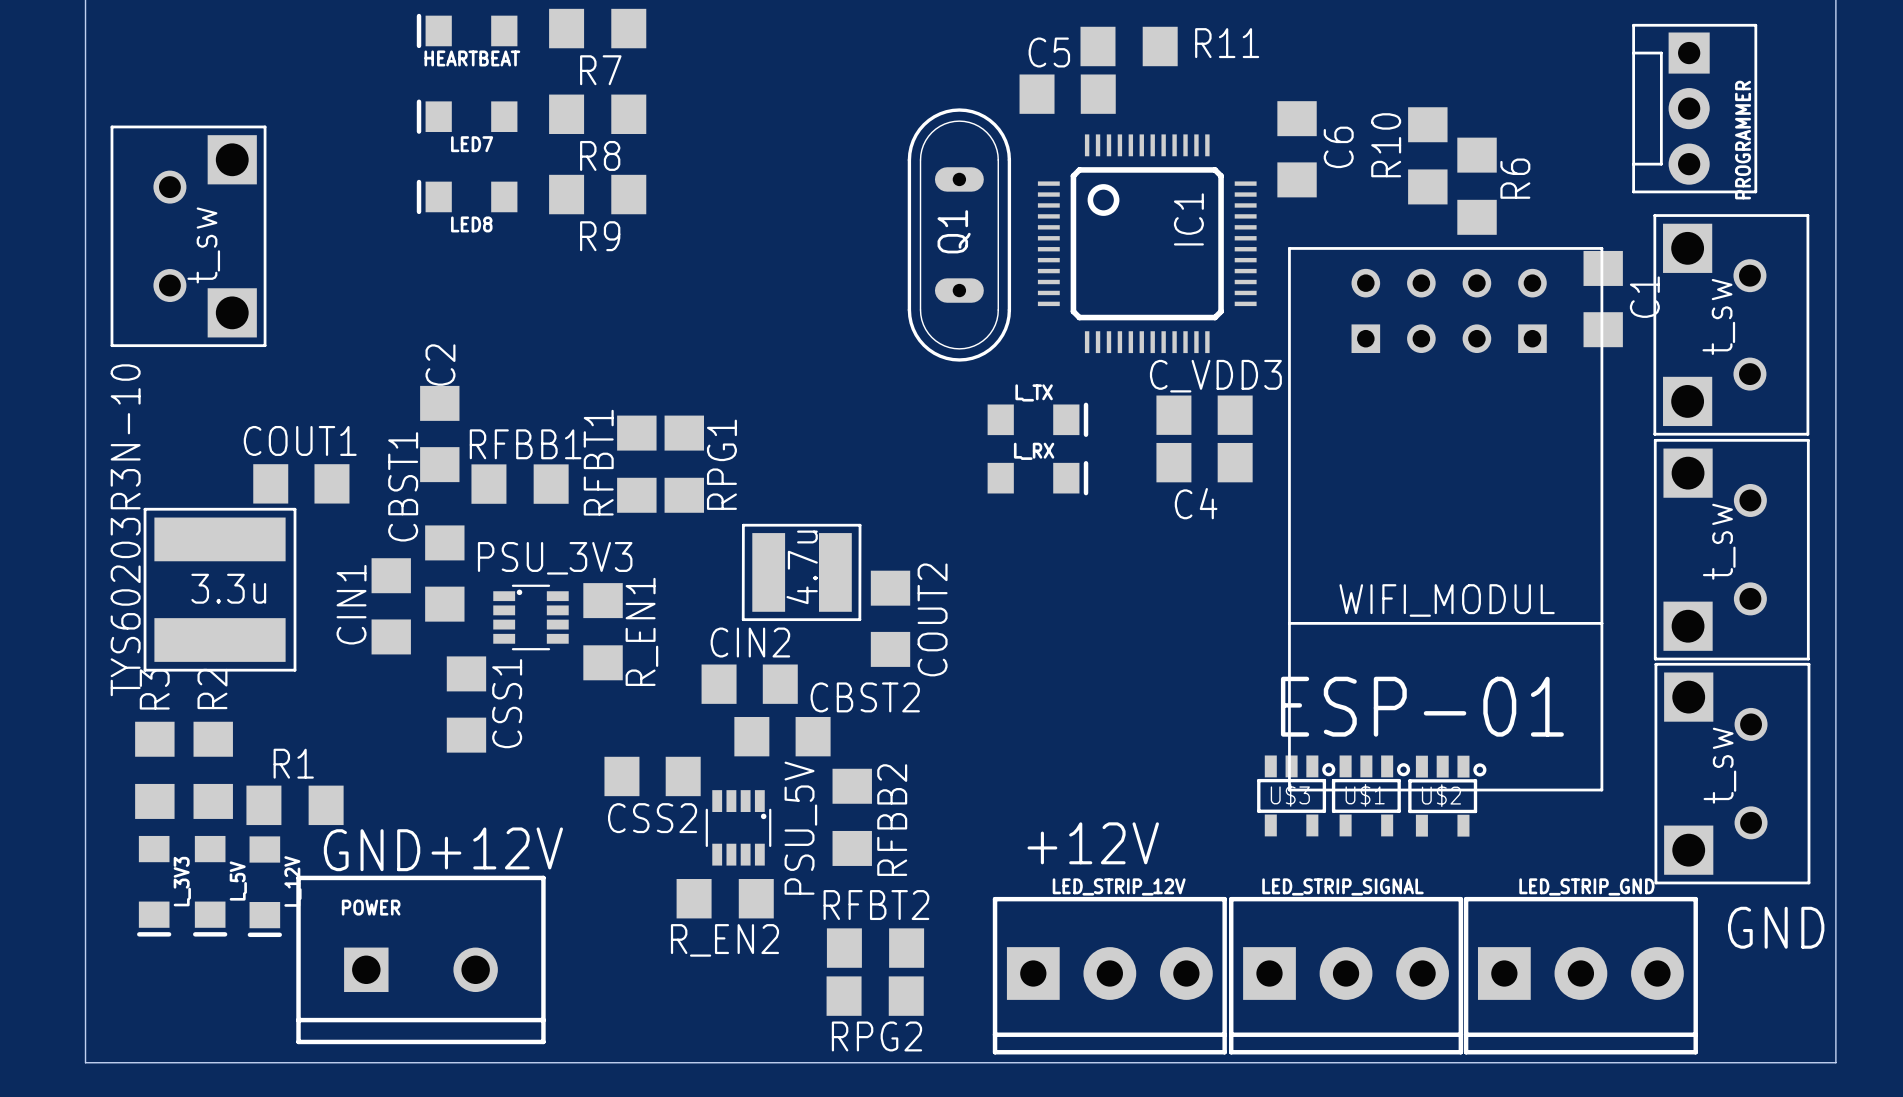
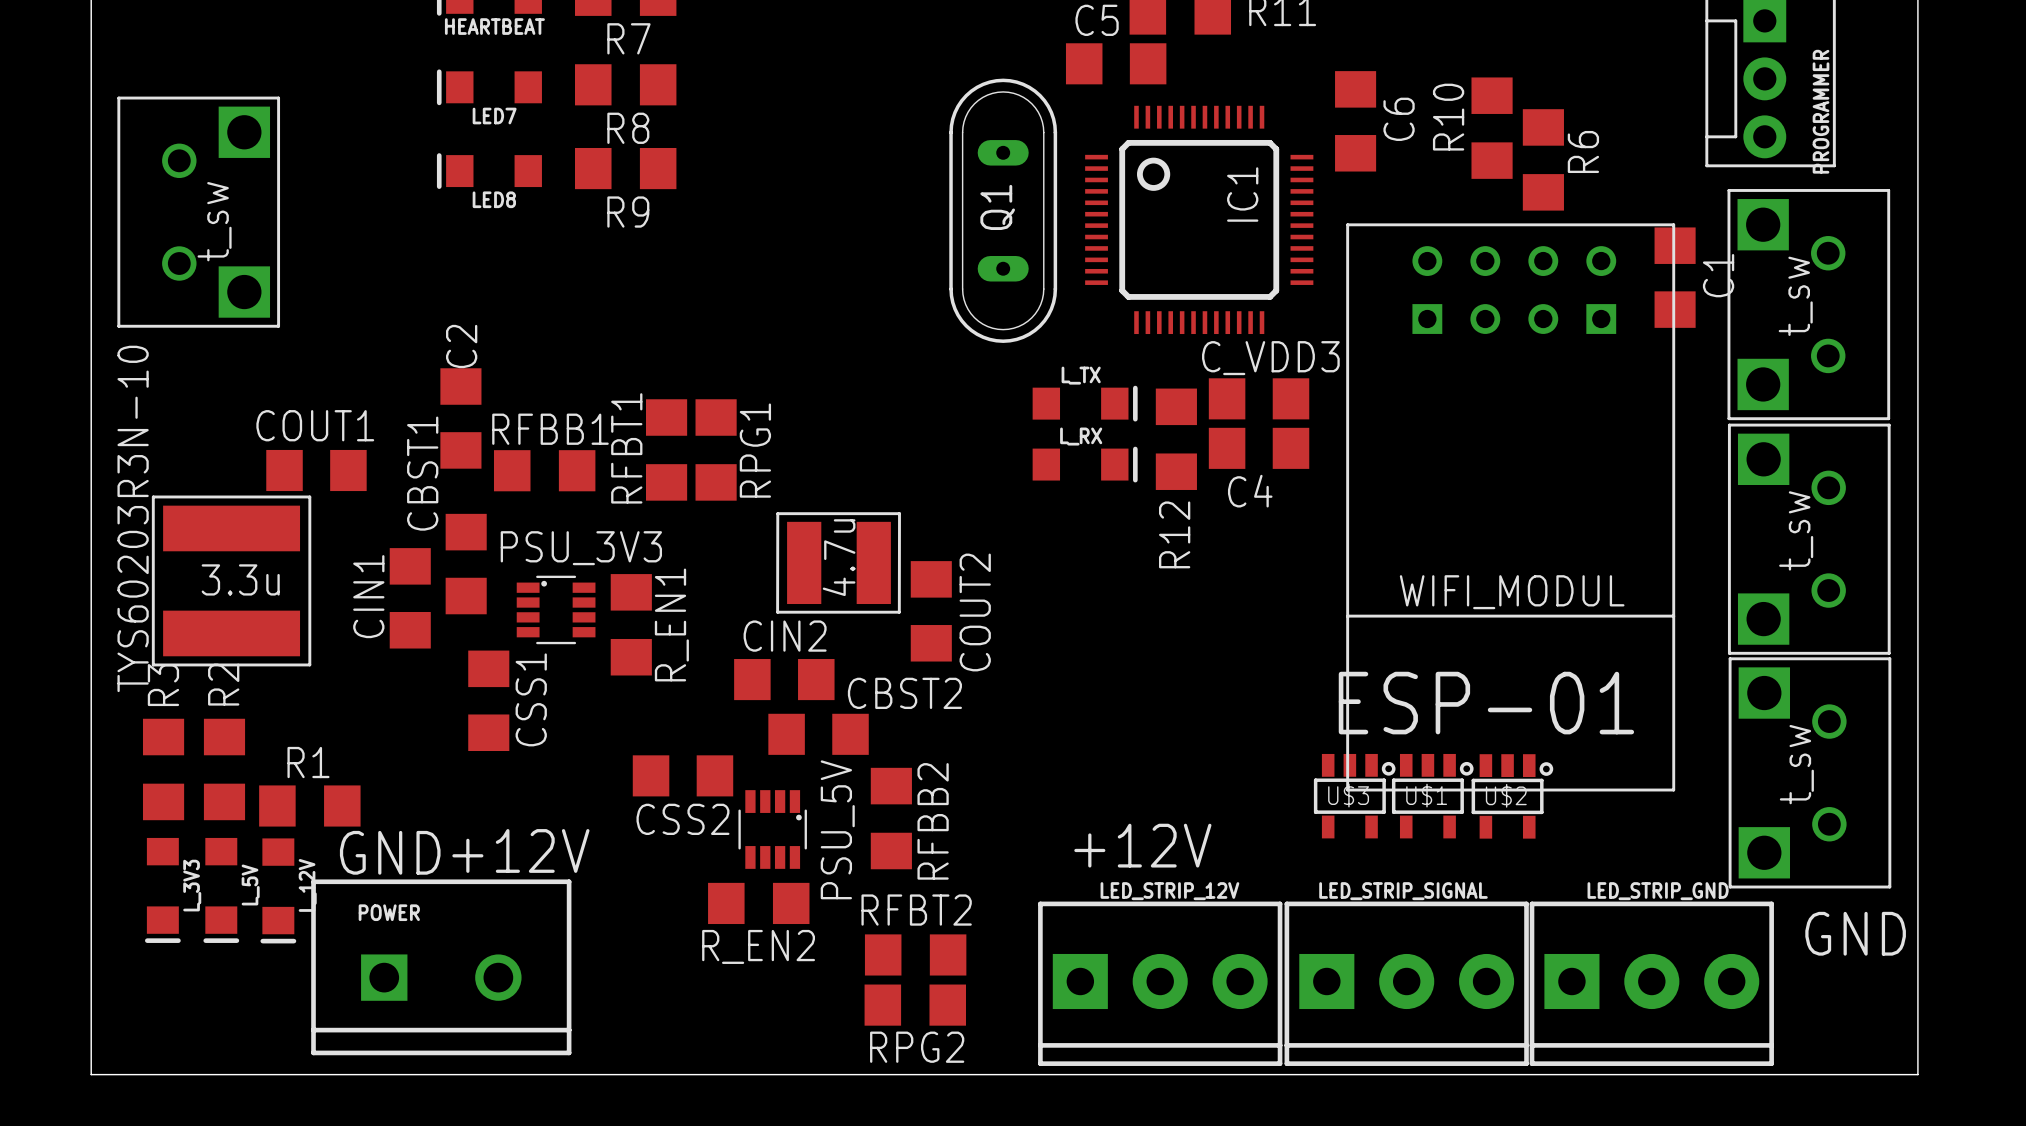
R12: none -> (1176, 439)

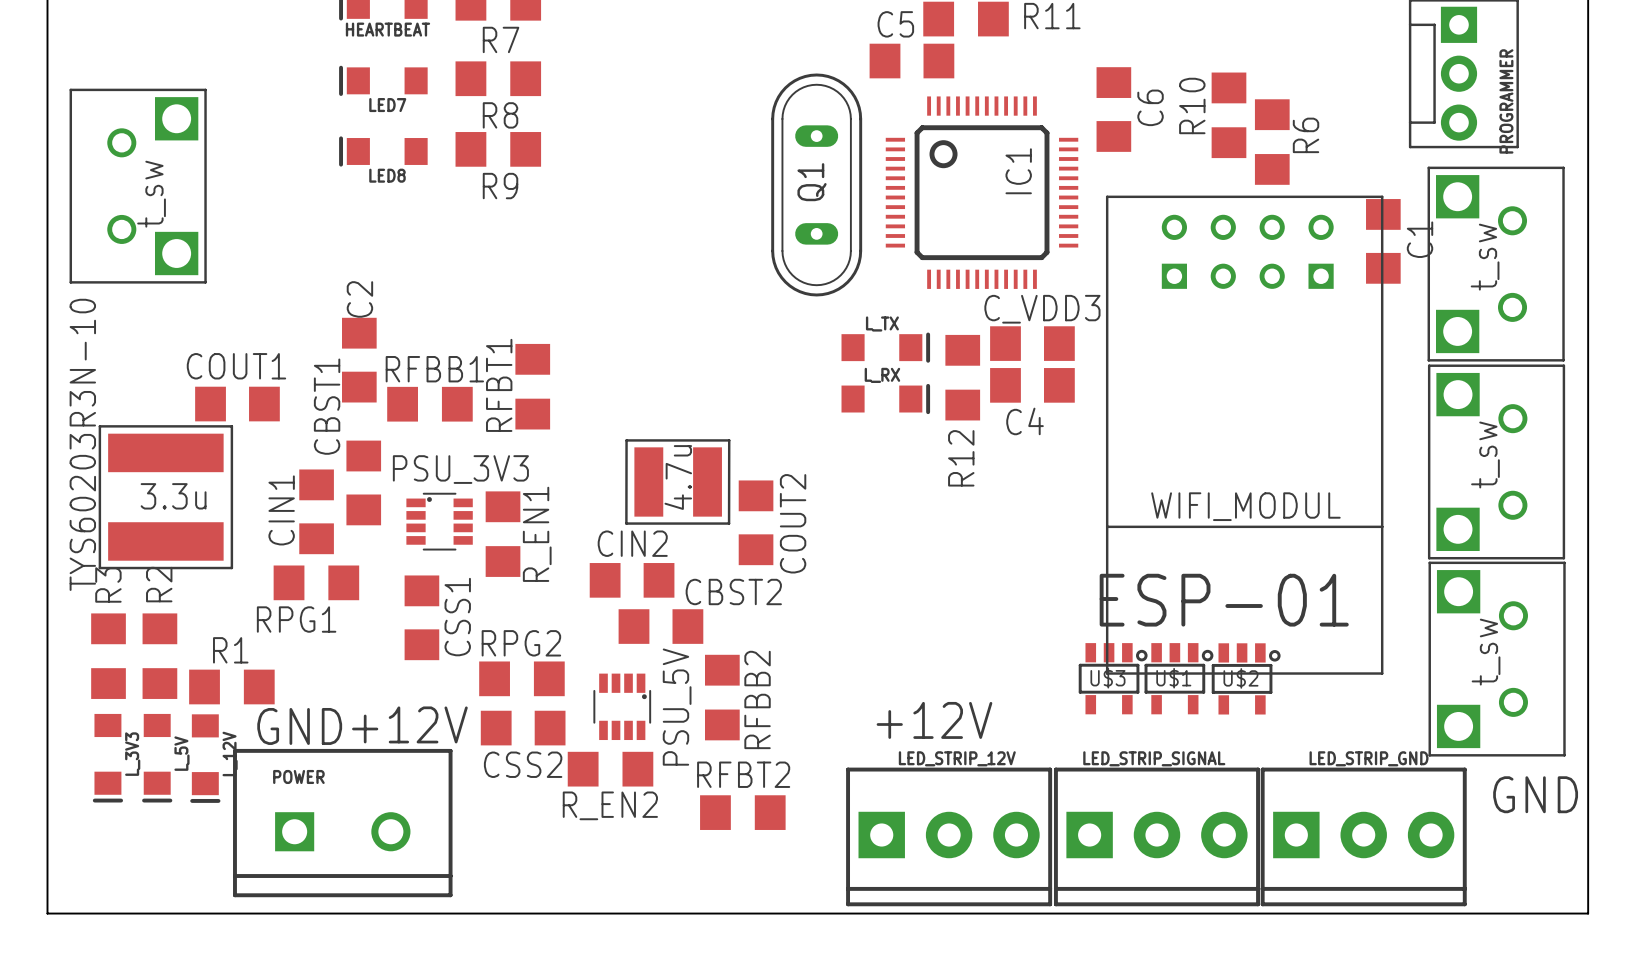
RPG1 rotation: 0° (716, 449) -> 90° clockwise (316, 582)
RPG1 position: (716, 449) -> (316, 582)
CSS1 position: (488, 700) -> (421, 617)
CSS2 position: (682, 775) -> (523, 728)
RPG2 position: (915, 1005) -> (521, 678)
RPG2 name position: RPG2 (917, 1047) -> RPG2 (521, 643)

